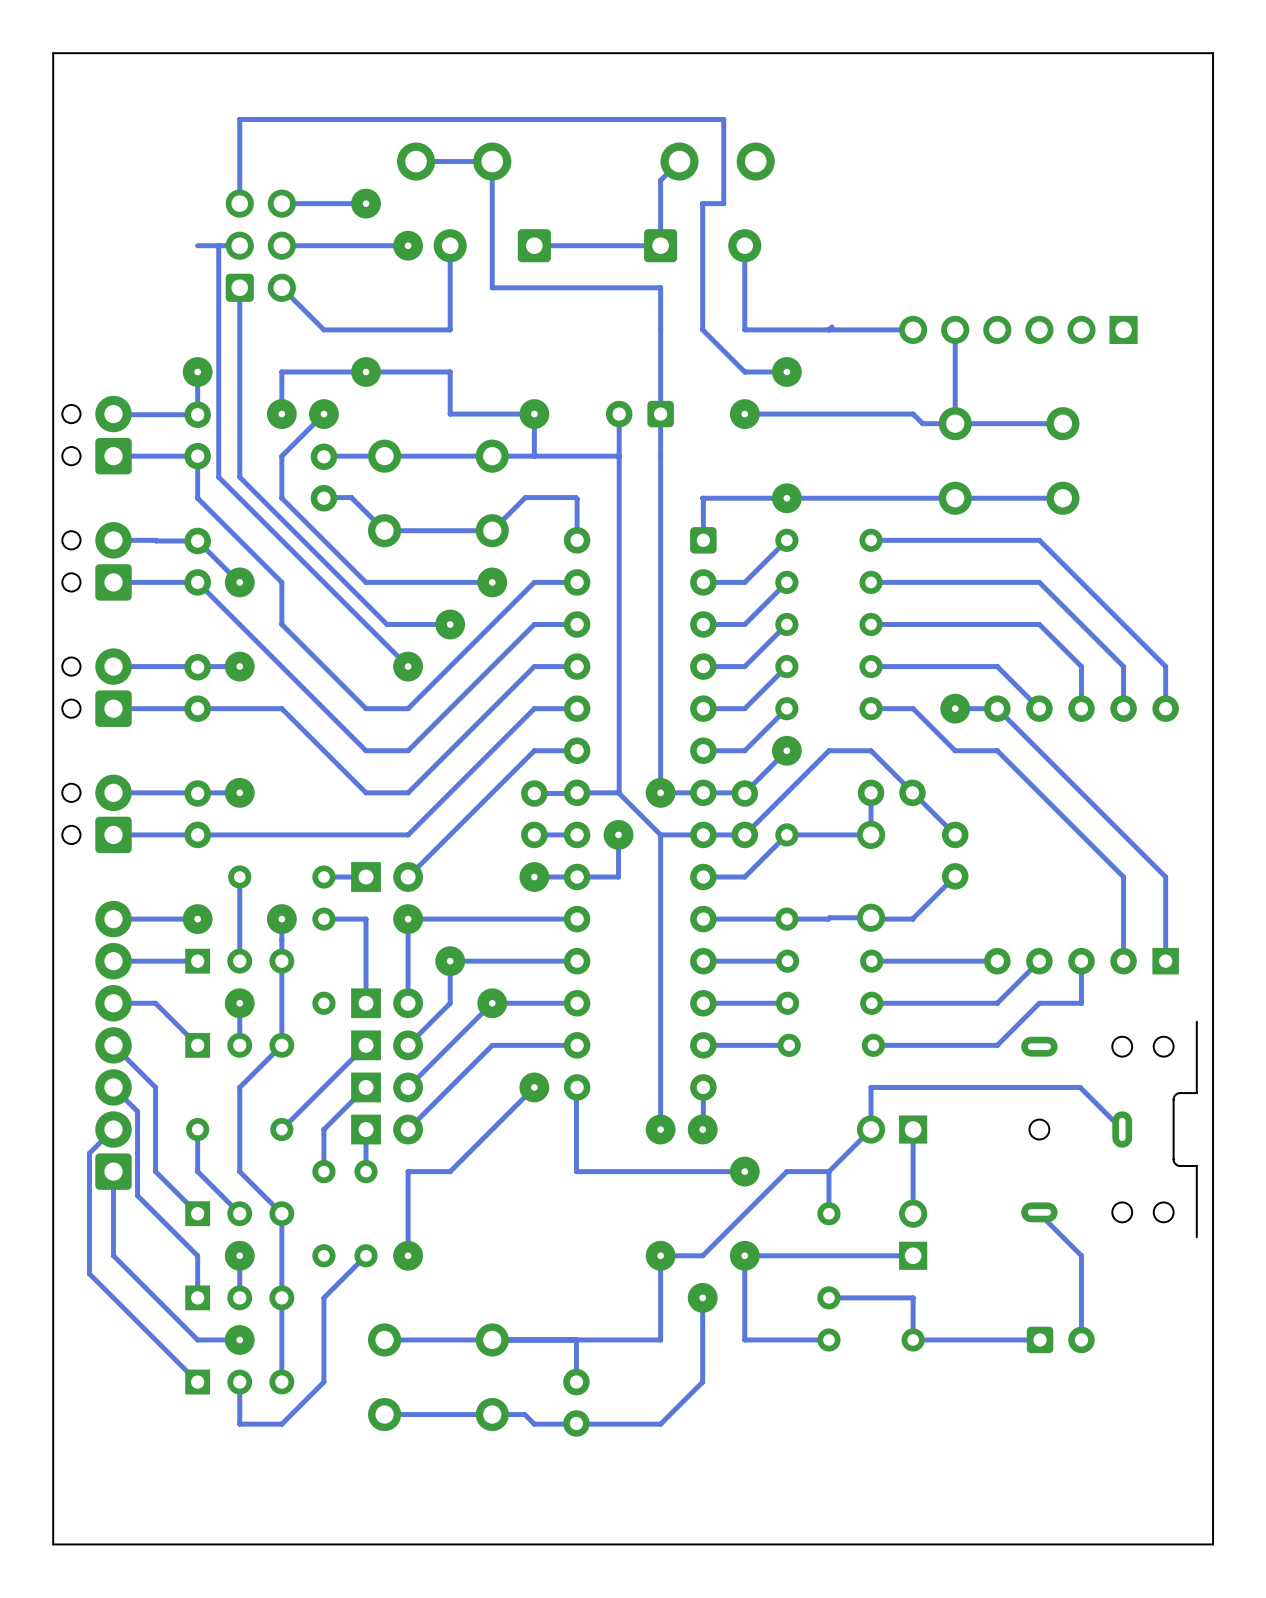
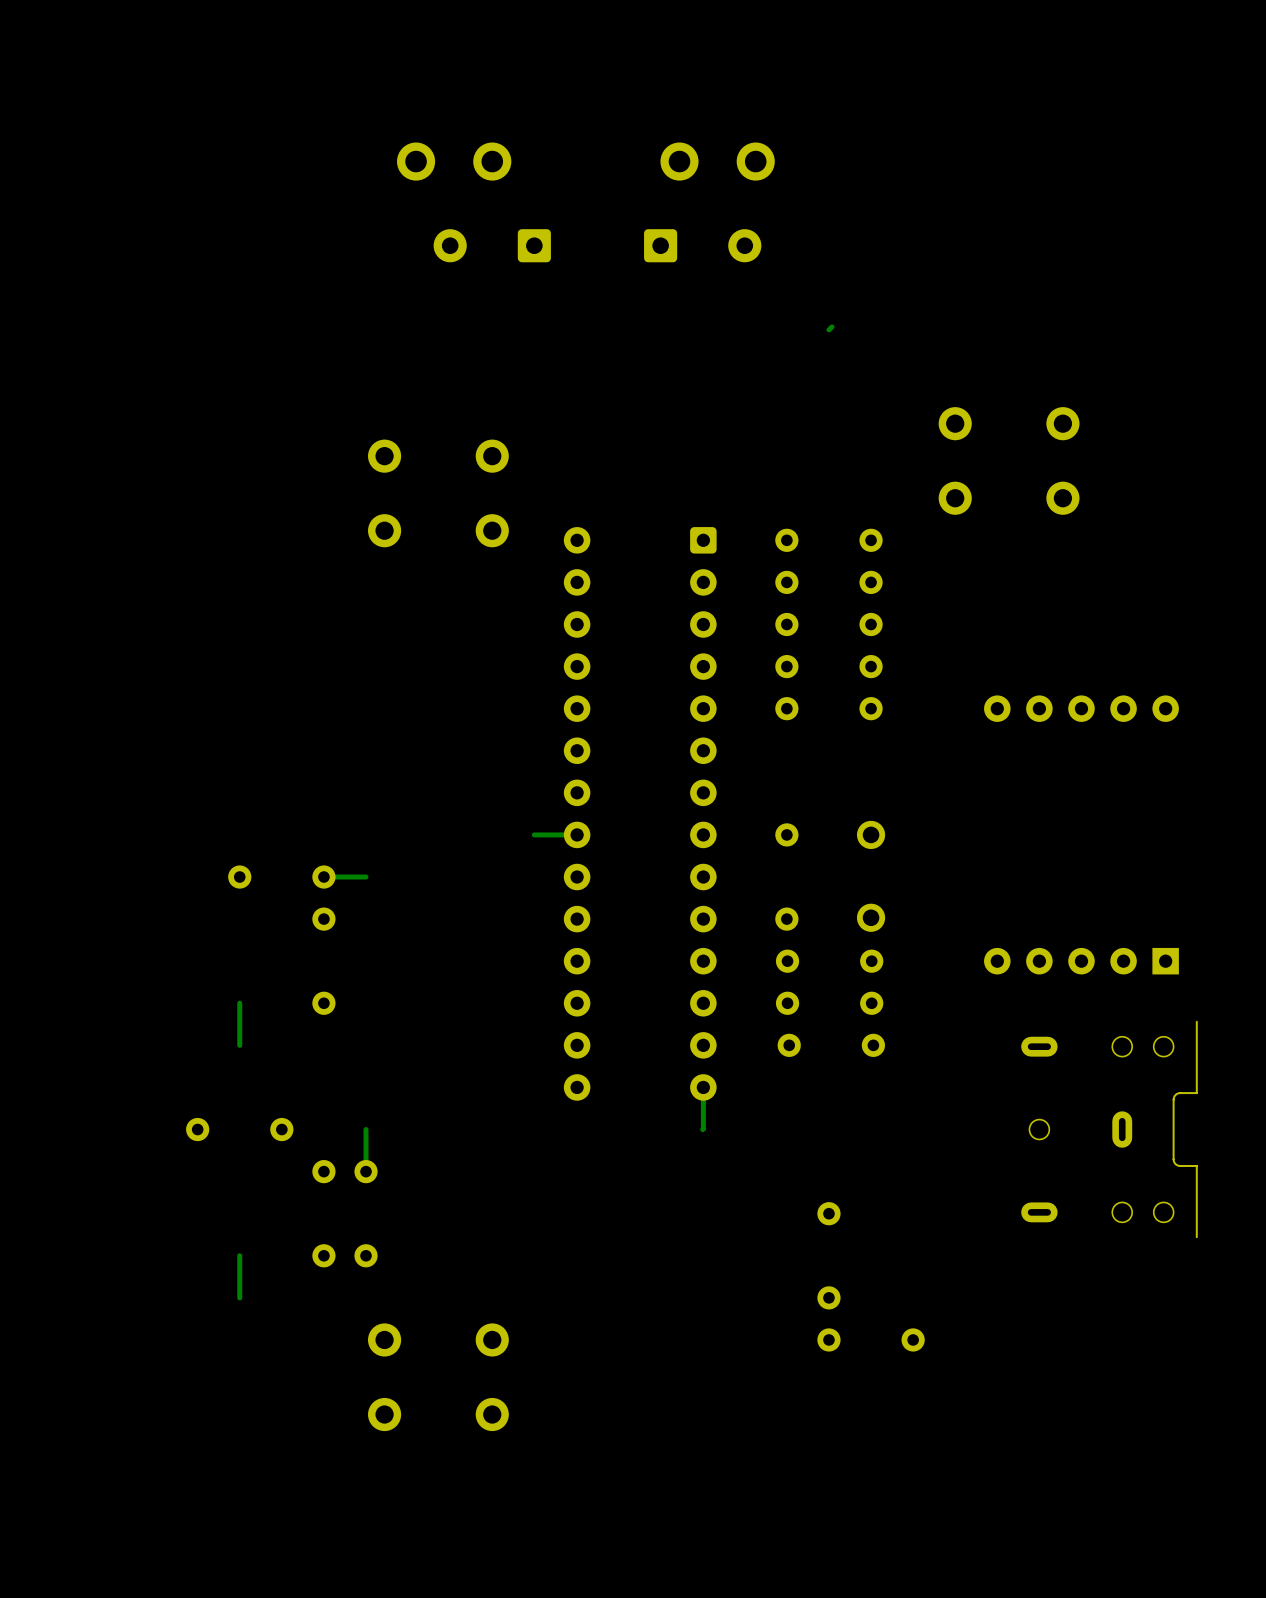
board edge: (1213, 53) (53, 53) (53, 1544) (1213, 1544) (1213, 53) -> none
bottom track: (416, 161) (492, 161) (492, 287) (660, 287) (660, 792) (744, 792) (786, 750) -> none
bottom track: (679, 161) (660, 180) (660, 245) (534, 245) -> none
bottom track: (239, 203) (239, 119) (723, 119) (723, 203) (702, 203) (702, 329) (744, 371) (786, 371) -> none
bottom track: (366, 203) (281, 203) -> none
via: (366, 203) -> none
bottom track: (218, 245) (218, 477) (408, 666) -> none
bottom track: (239, 245) (197, 245) -> none
part: (260, 245) -> none
bottom track: (408, 245) (281, 245) -> none
via: (408, 245) -> none
bottom track: (450, 245) (450, 329) (323, 329) (281, 287) -> none
bottom track: (744, 245) (744, 329) (913, 329) -> none
bottom track: (239, 287) (239, 477) (387, 624) (450, 624) -> none
bottom track: (955, 329) (955, 423) -> none
part: (1018, 329) -> none
bottom track: (197, 371) (197, 414) (113, 414) -> none
via: (197, 371) -> none
via: (366, 371) -> none
via: (786, 371) -> none
bottom track: (281, 414) (281, 371) (450, 371) (450, 414) (534, 414) (534, 456) -> none
via: (281, 414) -> none
bottom track: (323, 414) (281, 456) (281, 498) (366, 582) (492, 582) -> none
via: (323, 414) -> none
via: (534, 414) -> none
bottom track: (619, 414) (618, 456) -> none
part: (639, 414) -> none
bottom track: (744, 414) (913, 414) (922, 423) (1062, 423) -> none
via: (744, 414) -> none
part: (97, 435) -> none
part: (197, 435) -> none
bottom track: (113, 456) (197, 456) (197, 498) (281, 582) (281, 624) (366, 708) (408, 708) (534, 582) (577, 582) -> none
bottom track: (323, 456) (619, 456) (618, 792) -> none
part: (323, 477) -> none
bottom track: (323, 497) (351, 497) (384, 530) (492, 530) (525, 497) (575, 497) (577, 540) -> none
via: (786, 498) -> none
bottom track: (1062, 498) (702, 498) (703, 540) -> none
bottom track: (113, 540) (197, 540) (239, 582) -> none
bottom track: (786, 540) (744, 582) (703, 582) -> none
bottom track: (871, 540) (1039, 540) (1165, 666) (1165, 708) -> none
part: (97, 561) -> none
part: (197, 561) -> none
bottom track: (113, 582) (197, 582) (366, 750) (408, 750) (534, 624) (577, 624) -> none
via: (239, 582) -> none
via: (492, 582) -> none
bottom track: (786, 582) (744, 624) (703, 623) -> none
bottom track: (871, 582) (1039, 582) (1123, 666) (1123, 708) -> none
via: (450, 624) -> none
bottom track: (786, 624) (744, 666) (703, 665) -> none
bottom track: (871, 624) (1039, 624) (1081, 666) (1081, 708) -> none
bottom track: (239, 666) (113, 666) -> none
via: (239, 666) -> none
via: (408, 666) -> none
bottom track: (577, 666) (534, 666) (408, 792) (366, 792) (281, 708) (113, 708) -> none
bottom track: (786, 666) (744, 708) (703, 708) -> none
bottom track: (871, 666) (997, 666) (1039, 708) -> none
part: (97, 687) -> none
part: (197, 687) -> none
bottom track: (577, 708) (534, 708) (408, 834) (113, 834) -> none
bottom track: (786, 708) (744, 750) (703, 750) -> none
bottom track: (871, 708) (913, 708) (955, 750) (997, 750) (1123, 877) (1123, 961) -> none
bottom track: (955, 708) (997, 708) (1165, 877) (1165, 961) -> none
via: (955, 708) -> none
bottom track: (577, 750) (534, 750) (408, 877) -> none
via: (786, 750) -> none
bottom track: (239, 792) (113, 792) -> none
via: (239, 792) -> none
bottom track: (618, 792) (534, 793) -> none
bottom track: (618, 792) (660, 834) -> none
via: (660, 792) -> none
bottom track: (871, 792) (871, 834) (786, 834) (744, 877) (703, 877) -> none
part: (891, 792) -> none
part: (97, 813) -> none
part: (197, 814) -> none
part: (534, 814) -> none
part: (744, 814) -> none
bottom track: (618, 834) (618, 877) (534, 877) -> none
via: (618, 834) -> none
bottom track: (660, 834) (660, 1129) -> none
bottom track: (955, 834) (871, 750) (828, 750) (744, 834) (660, 834) -> none
part: (955, 855) -> none
bottom track: (955, 876) (913, 919) (703, 919) -> none
bottom track: (239, 877) (239, 961) -> none
part: (387, 877) -> none
via: (534, 877) -> none
bottom track: (197, 919) (113, 919) -> none
via: (197, 919) -> none
bottom track: (281, 919) (281, 1045) (239, 1087) (239, 1171) (281, 1213) (281, 1382) -> none
via: (281, 919) -> none
bottom track: (323, 919) (366, 919) (366, 1003) -> none
via: (408, 919) -> none
bottom track: (577, 919) (408, 919) (408, 1003) -> none
bottom track: (197, 961) (113, 961) -> none
part: (239, 961) -> none
via: (450, 961) -> none
bottom track: (577, 961) (450, 961) (450, 1003) (408, 1045) -> none
bottom track: (787, 961) (703, 961) -> none
bottom track: (997, 961) (871, 961) -> none
bottom track: (1039, 961) (997, 1003) (871, 1003) -> none
bottom track: (1081, 961) (1081, 1003) (1039, 1003) (997, 1045) (873, 1045) -> none
bottom track: (113, 1003) (155, 1003) (197, 1045) -> none
via: (239, 1003) -> none
part: (387, 1003) -> none
via: (492, 1003) -> none
bottom track: (577, 1003) (492, 1003) (408, 1087) -> none
bottom track: (787, 1003) (703, 1003) -> none
bottom track: (113, 1045) (155, 1087) (155, 1171) (197, 1213) -> none
part: (113, 1045) -> none
part: (239, 1045) -> none
bottom track: (366, 1045) (281, 1129) -> none
part: (387, 1045) -> none
bottom track: (577, 1045) (492, 1045) (408, 1129) -> none
bottom track: (789, 1045) (703, 1045) -> none
bottom track: (113, 1087) (137, 1111) (137, 1195) (197, 1255) (197, 1297) -> none
bottom track: (366, 1087) (323, 1129) (323, 1171) -> none
part: (387, 1087) -> none
bottom track: (534, 1087) (450, 1171) (408, 1171) (408, 1255) -> none
via: (534, 1087) -> none
bottom track: (576, 1087) (576, 1171) (744, 1171) -> none
bottom track: (113, 1129) (89, 1153) (89, 1273) (197, 1382) -> none
bottom track: (197, 1129) (197, 1171) (239, 1213) -> none
part: (387, 1129) -> none
via: (660, 1129) -> none
via: (702, 1129) -> none
part: (892, 1129) -> none
bottom track: (913, 1129) (913, 1213) -> none
bottom track: (1122, 1130) (1080, 1087) (871, 1087) (871, 1129) (828, 1171) -> none
bottom track: (113, 1171) (113, 1255) (197, 1339) (239, 1339) -> none
via: (744, 1171) -> none
bottom track: (828, 1171) (786, 1171) (702, 1255) (660, 1255) -> none
bottom track: (828, 1171) (828, 1213) -> none
part: (239, 1213) -> none
bottom track: (1039, 1213) (1081, 1255) (1081, 1339) -> none
part: (913, 1234) -> none
via: (239, 1255) -> none
bottom track: (366, 1255) (323, 1297) (323, 1382) (281, 1424) (239, 1424) (239, 1382) -> none
via: (408, 1255) -> none
bottom track: (660, 1255) (660, 1339) (384, 1339) -> none
via: (660, 1255) -> none
via: (744, 1255) -> none
bottom track: (913, 1255) (744, 1255) (744, 1339) (828, 1339) -> none
part: (239, 1297) -> none
bottom track: (702, 1297) (702, 1382) (660, 1424) (534, 1424) (524, 1414) (384, 1414) -> none
via: (702, 1297) -> none
bottom track: (828, 1297) (913, 1297) (913, 1339) (1040, 1339) -> none
via: (239, 1339) -> none
bottom track: (576, 1339) (576, 1382) -> none
part: (1060, 1339) -> none
part: (239, 1382) -> none
part: (576, 1402) -> none

